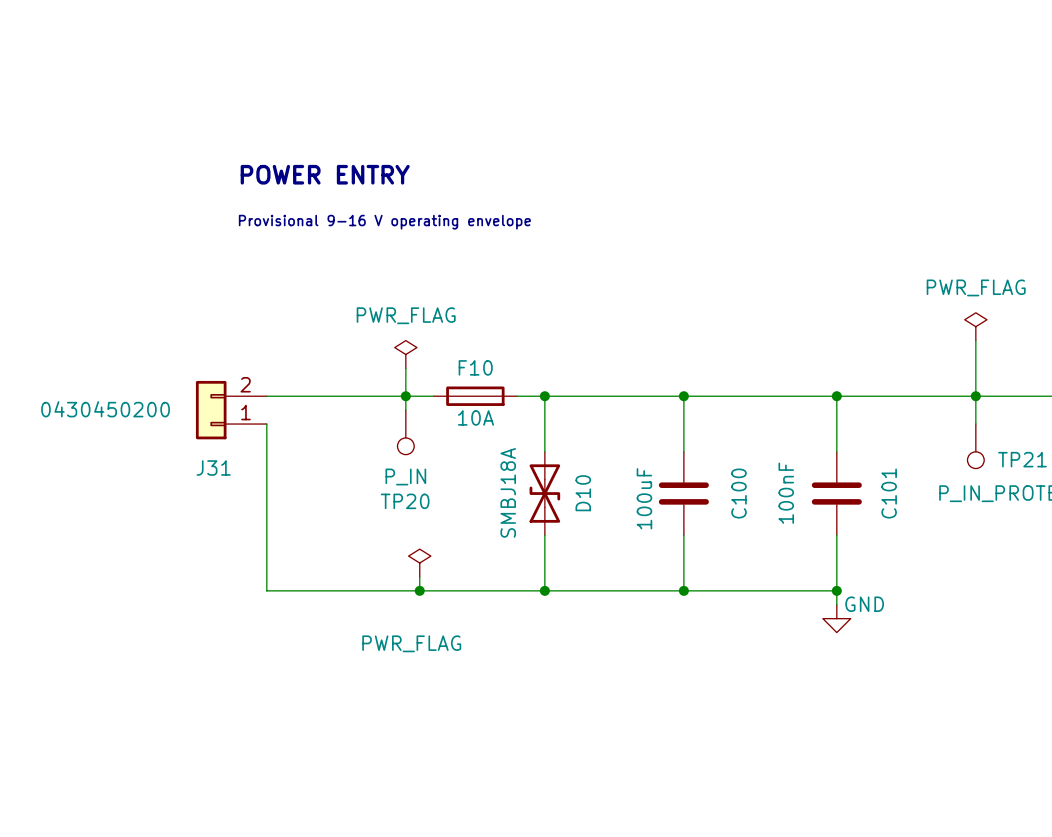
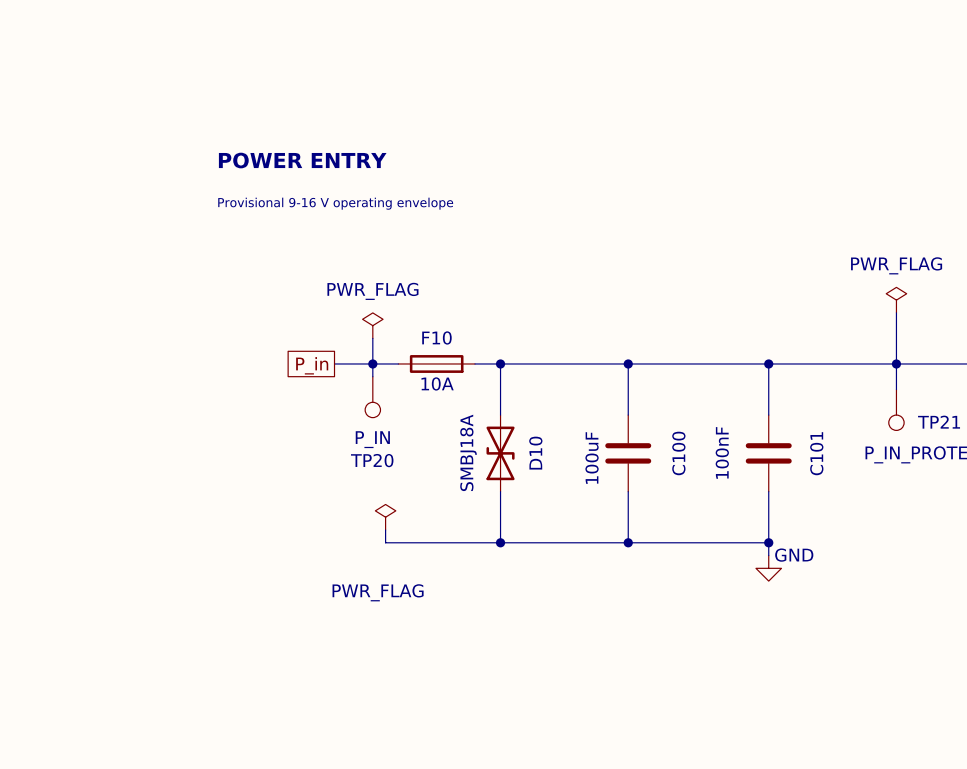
wire: (266, 396) (364, 396) -> none
global label: none -> P_in (312, 365)
J31: 0430450200 (231, 410) -> none
wire: (266, 424) (266, 590) (419, 590) -> none
junction: (419, 590) -> none

